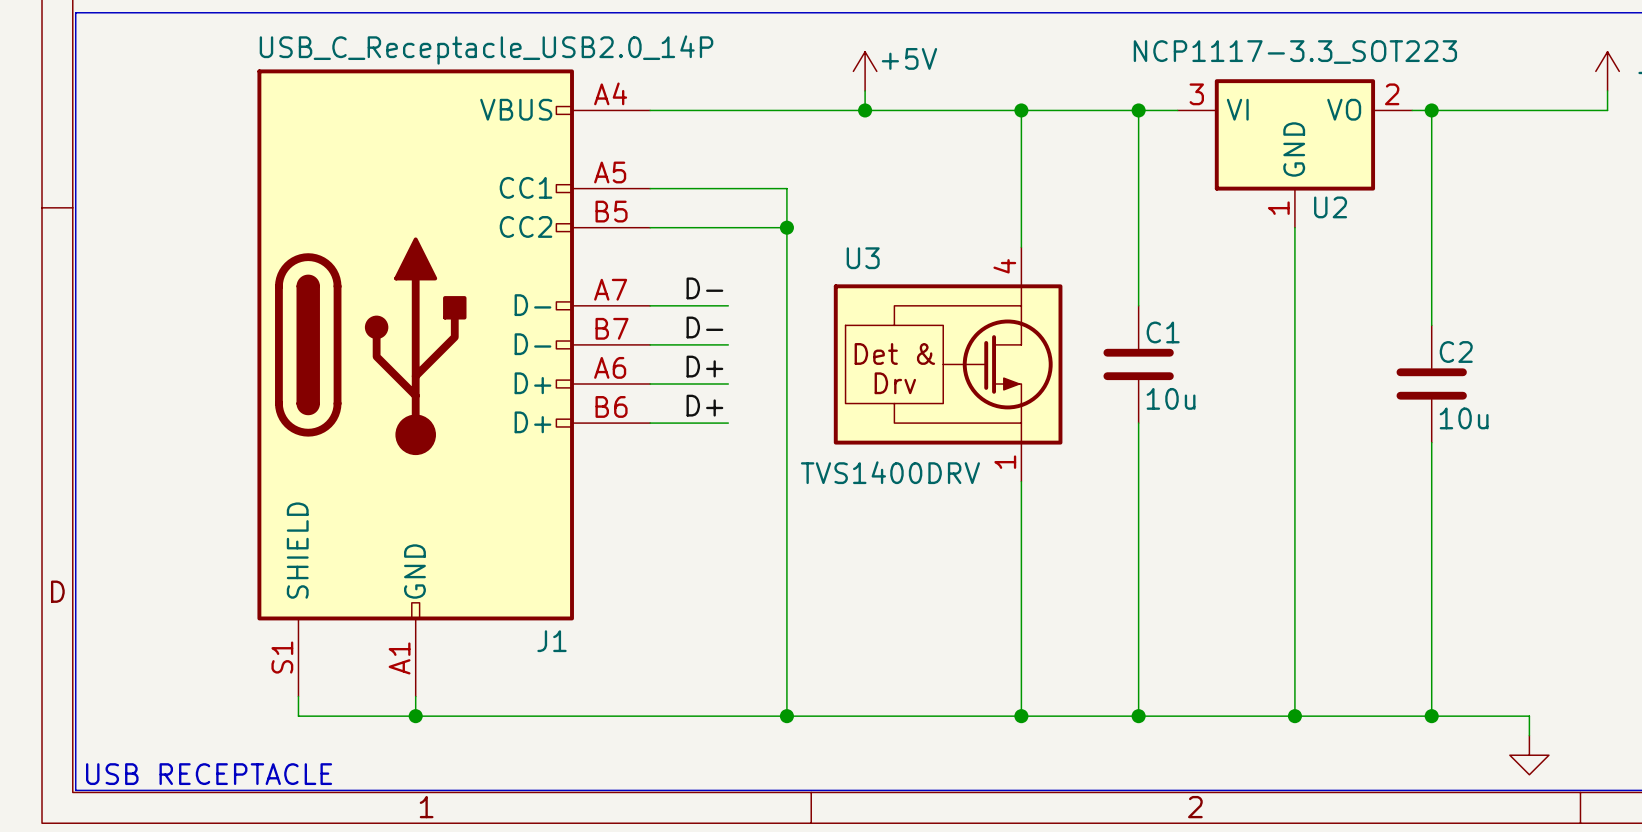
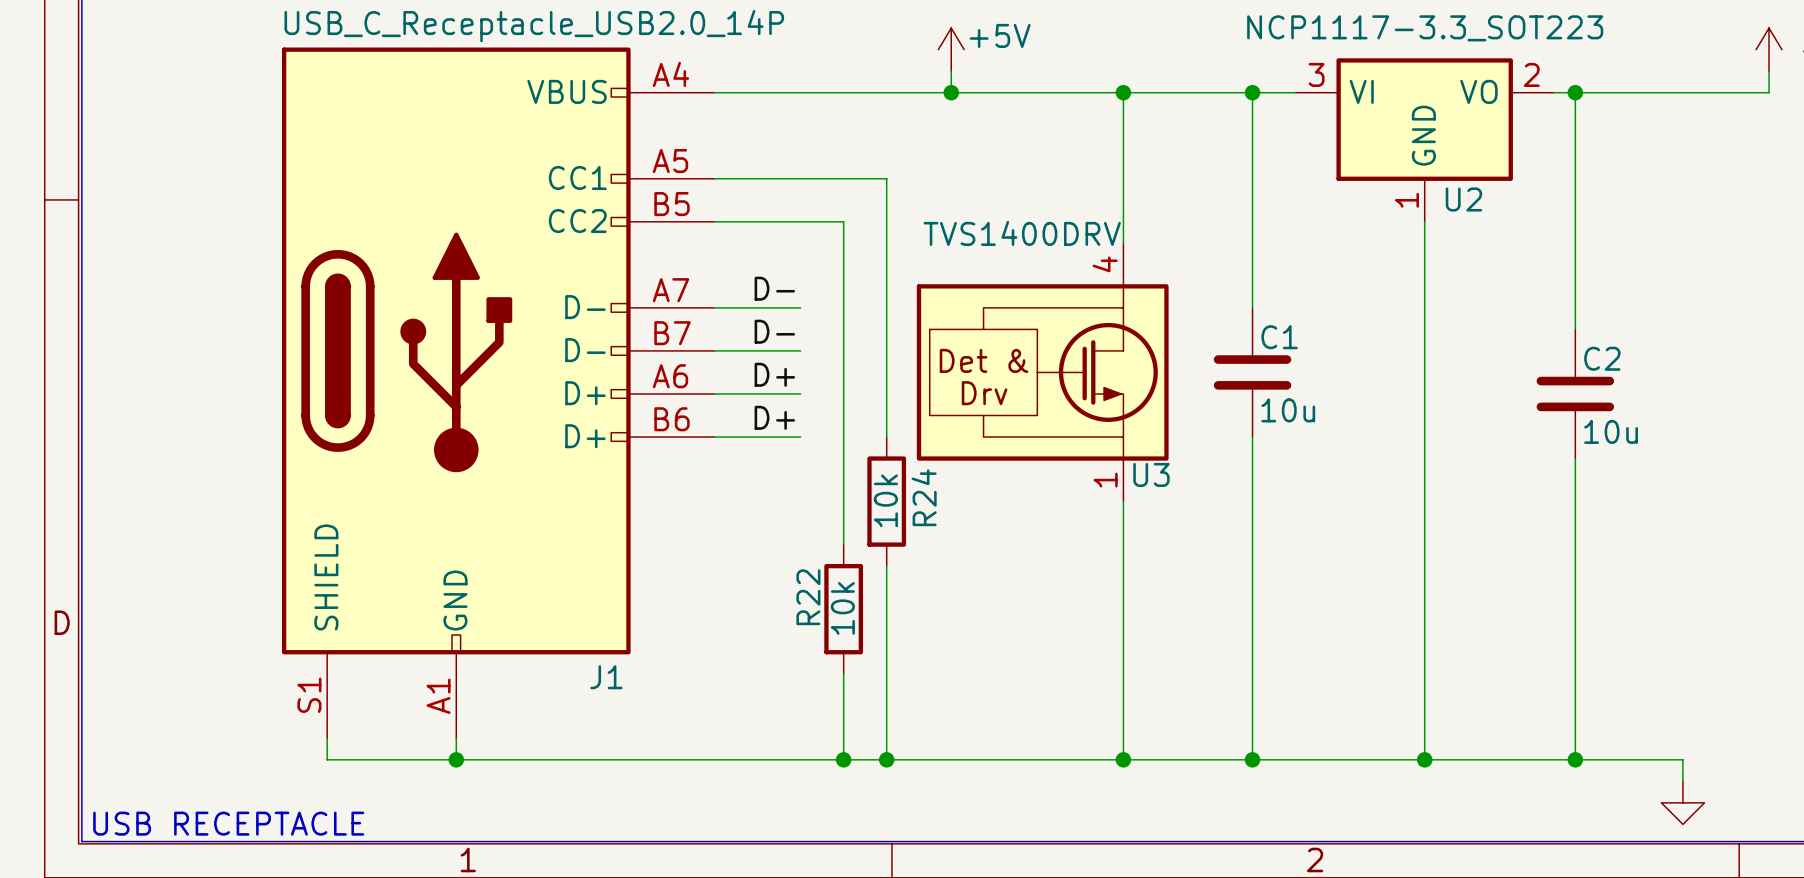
wire: (786, 188) (786, 716) -> (865, 178) (886, 178) (886, 437)
wire: (767, 227) (786, 227) -> (843, 221) (843, 544)
junction: (786, 227) -> none
U3 name position: U3 (863, 258) -> U3 (1151, 474)
U3 value position: TVS1400DRV (890, 472) -> TVS1400DRV (1022, 233)
R24: none -> 10k (886, 501)
wire: none -> (886, 566) (886, 759)
R22: none -> 10k (843, 609)
wire: none -> (843, 673) (843, 759)
junction: none -> (843, 759)
junction: (786, 716) -> none
junction: none -> (886, 759)

